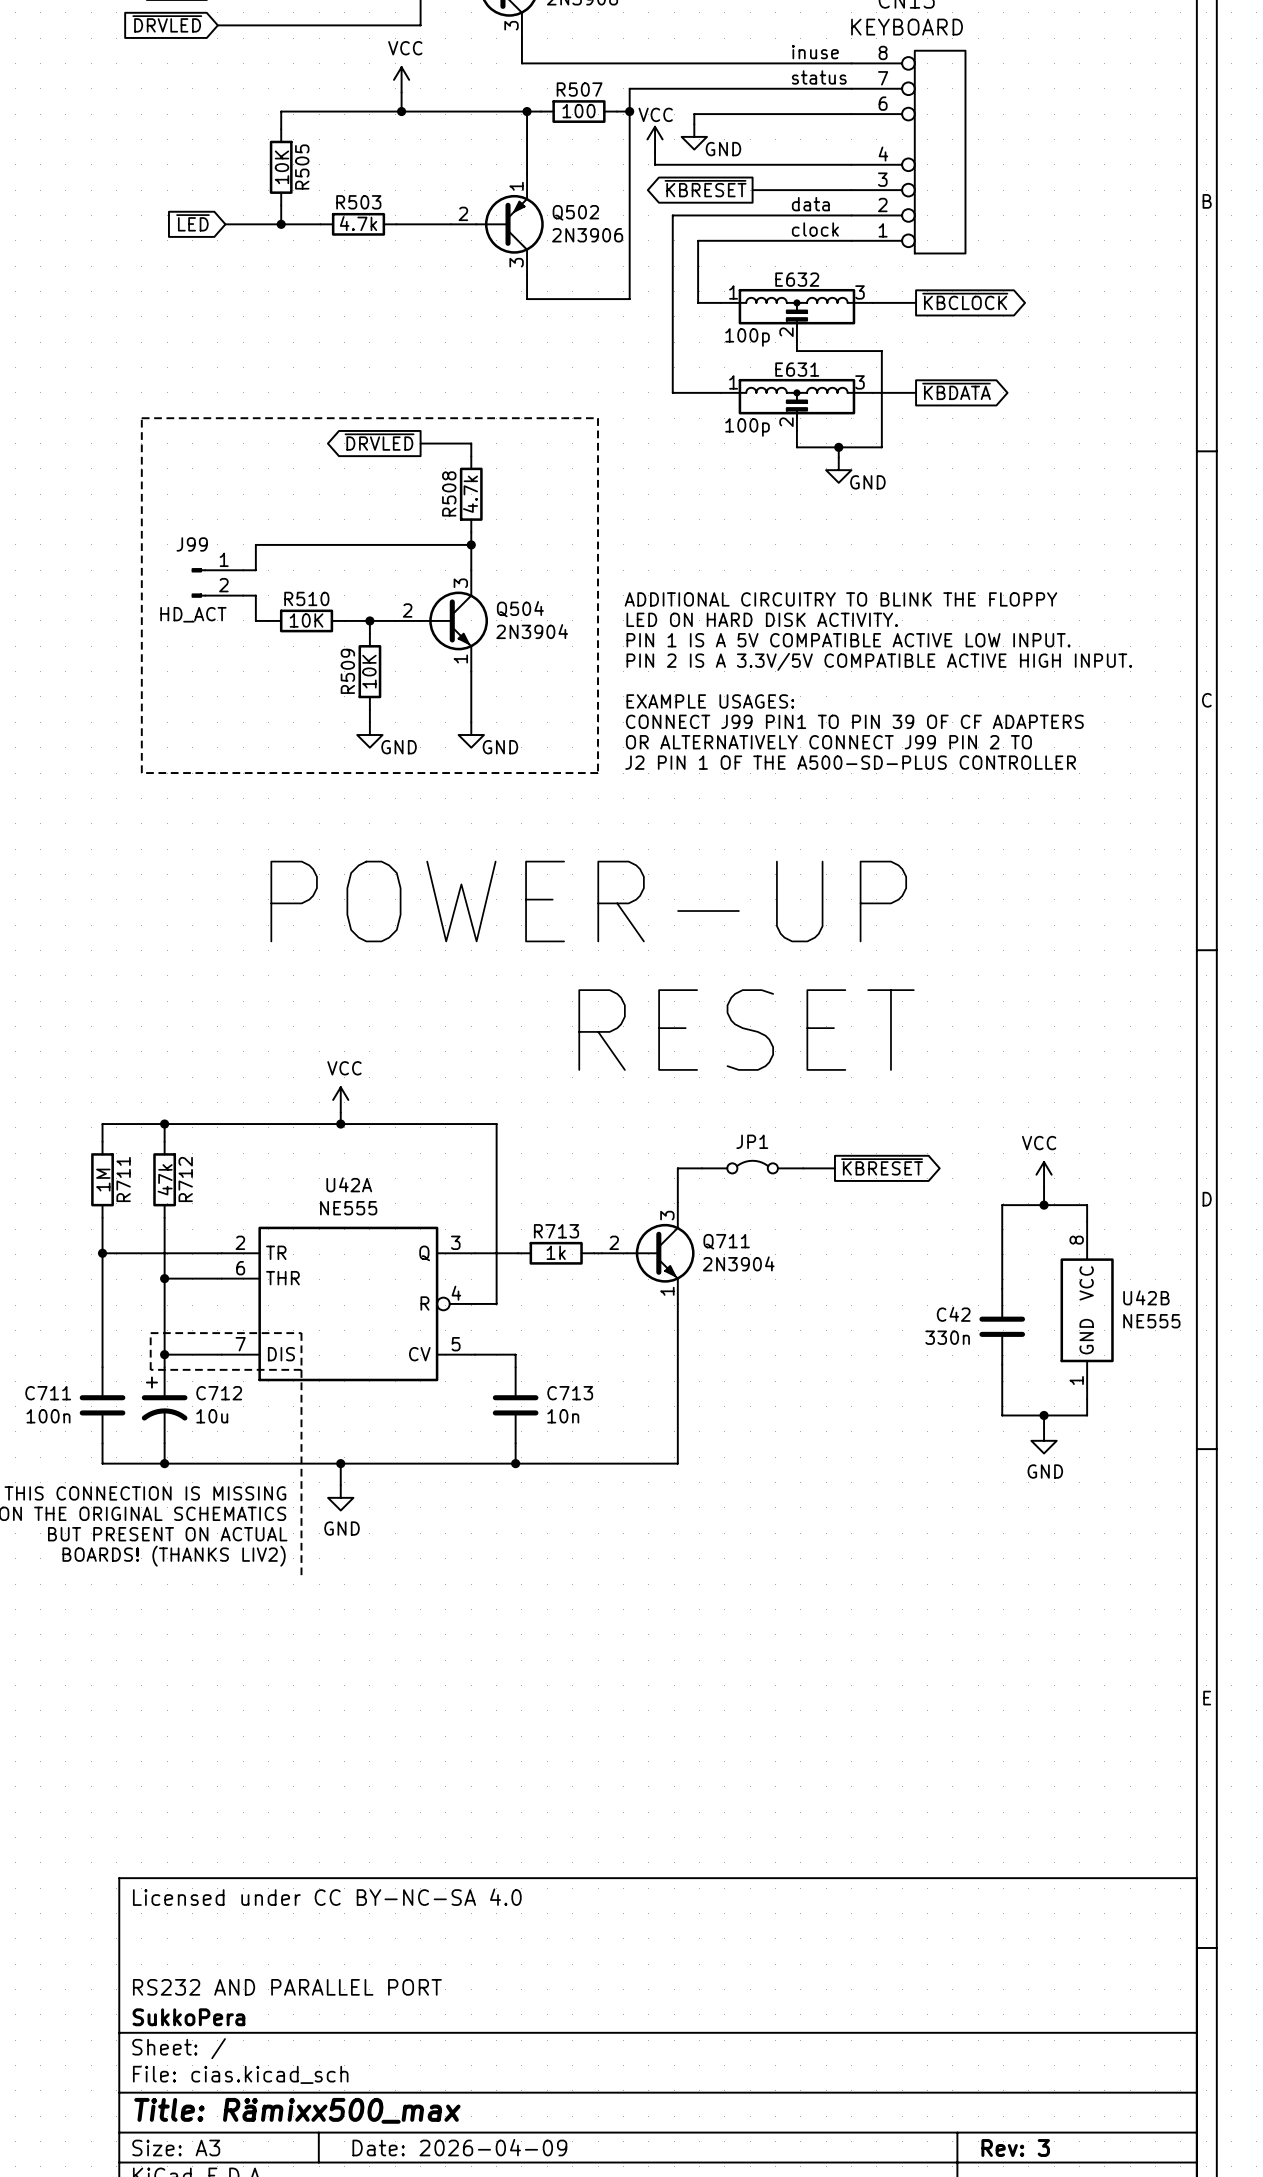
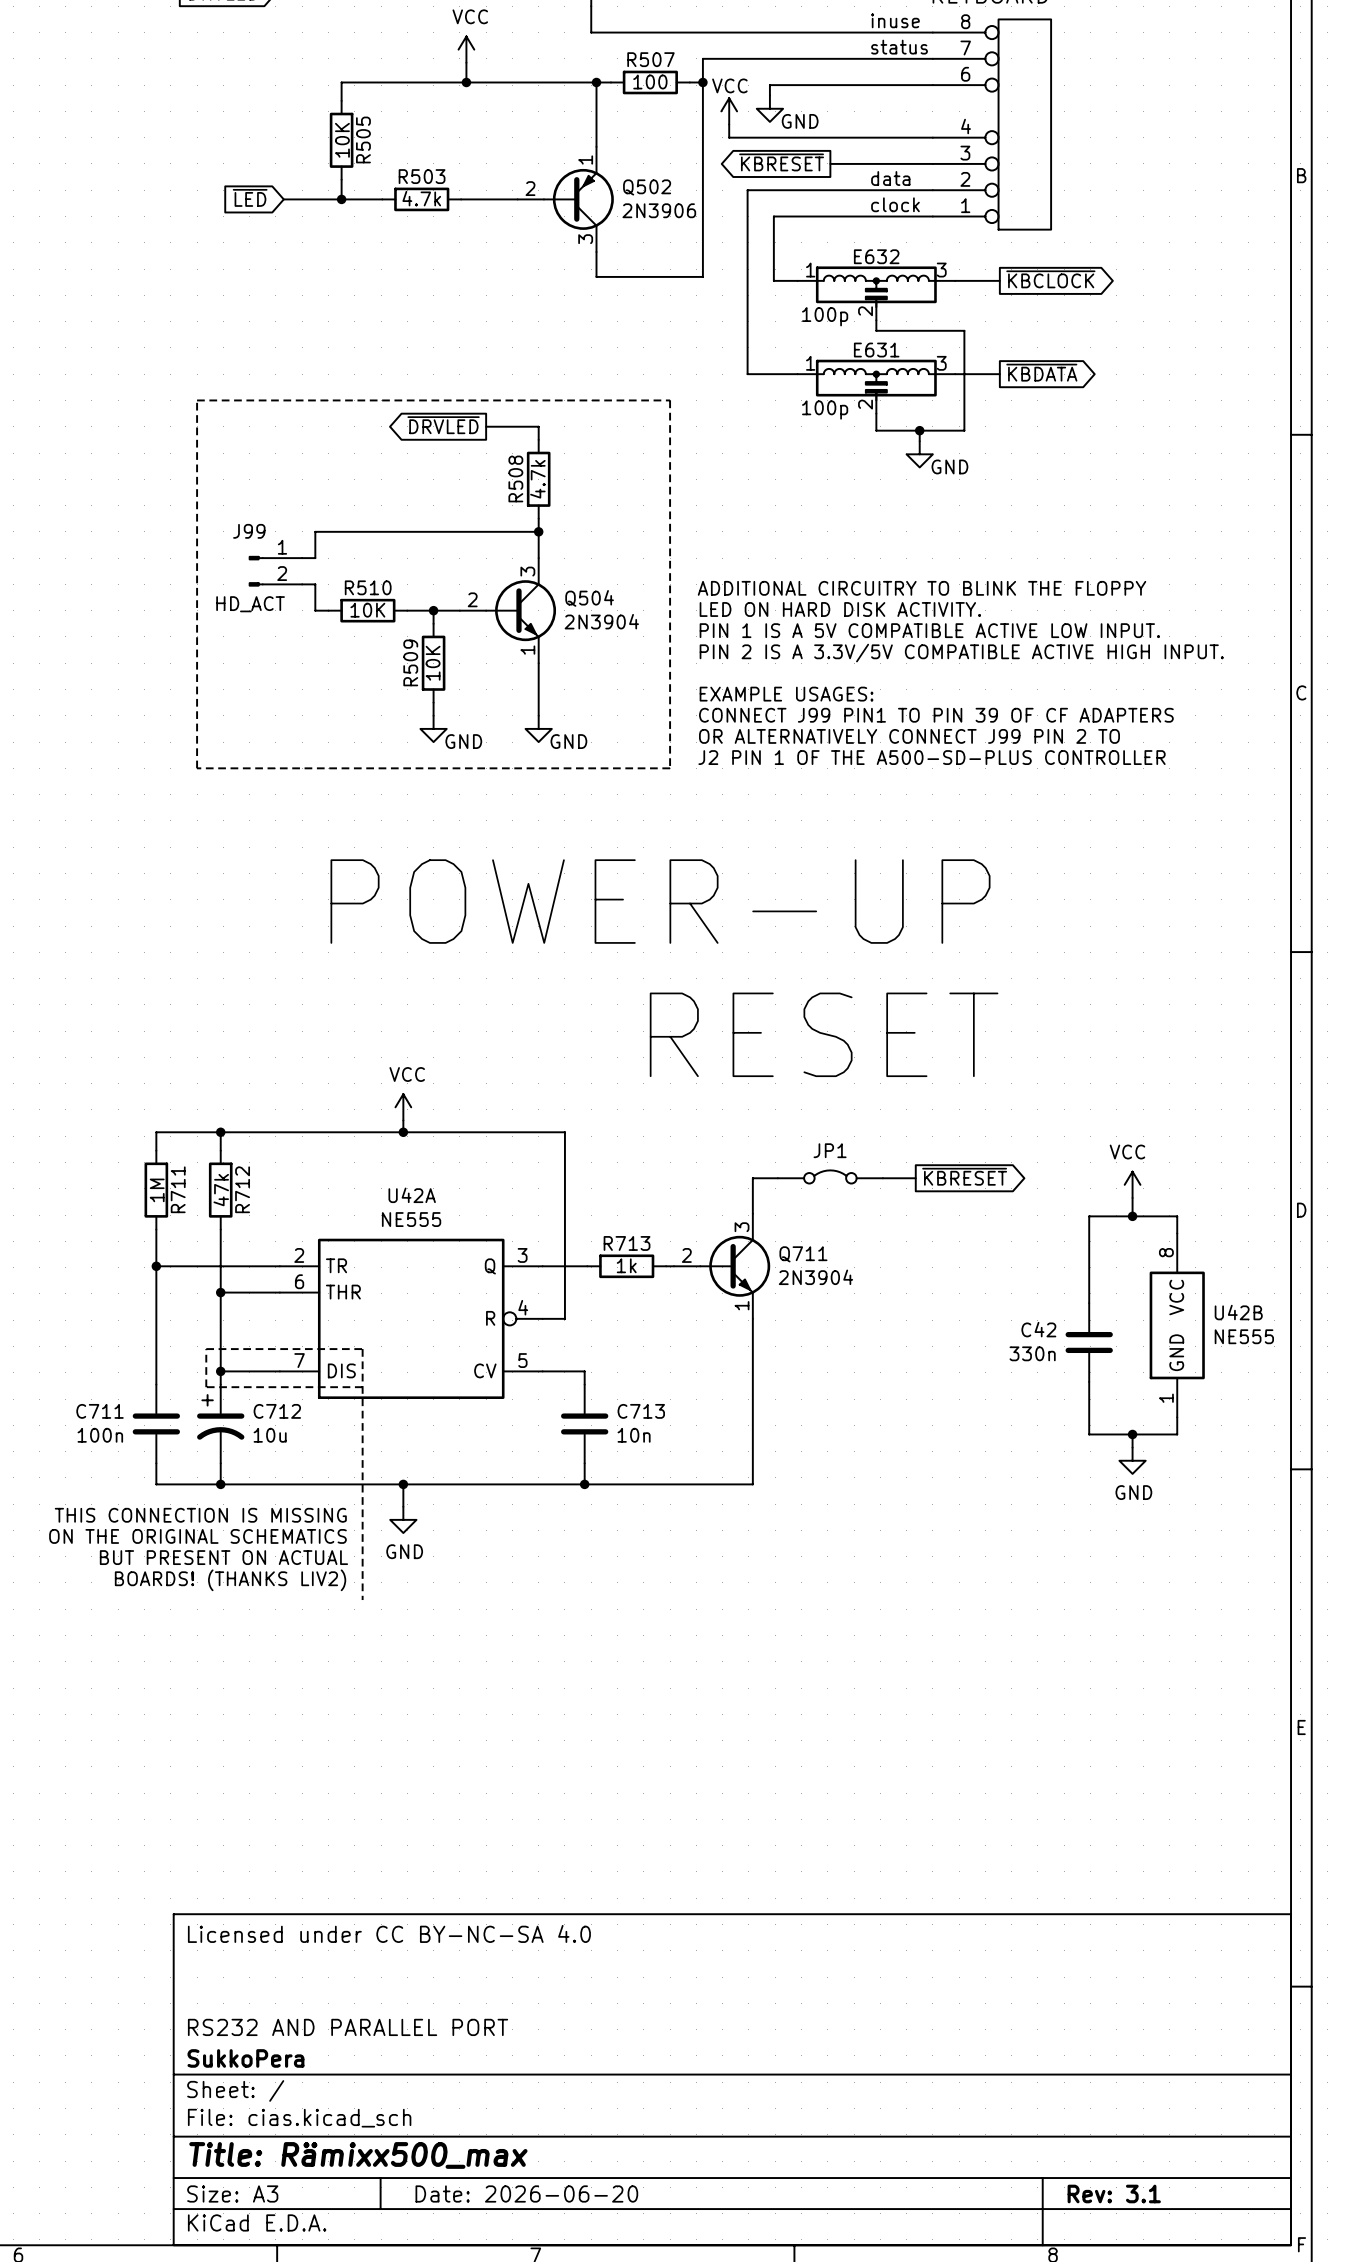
title block: Date: 2026-04-09 (459, 2147) -> Date: 2026-06-20 (526, 2193)
title block: Rev: 3 (1015, 2147) -> Rev: 3.1 (1114, 2193)

